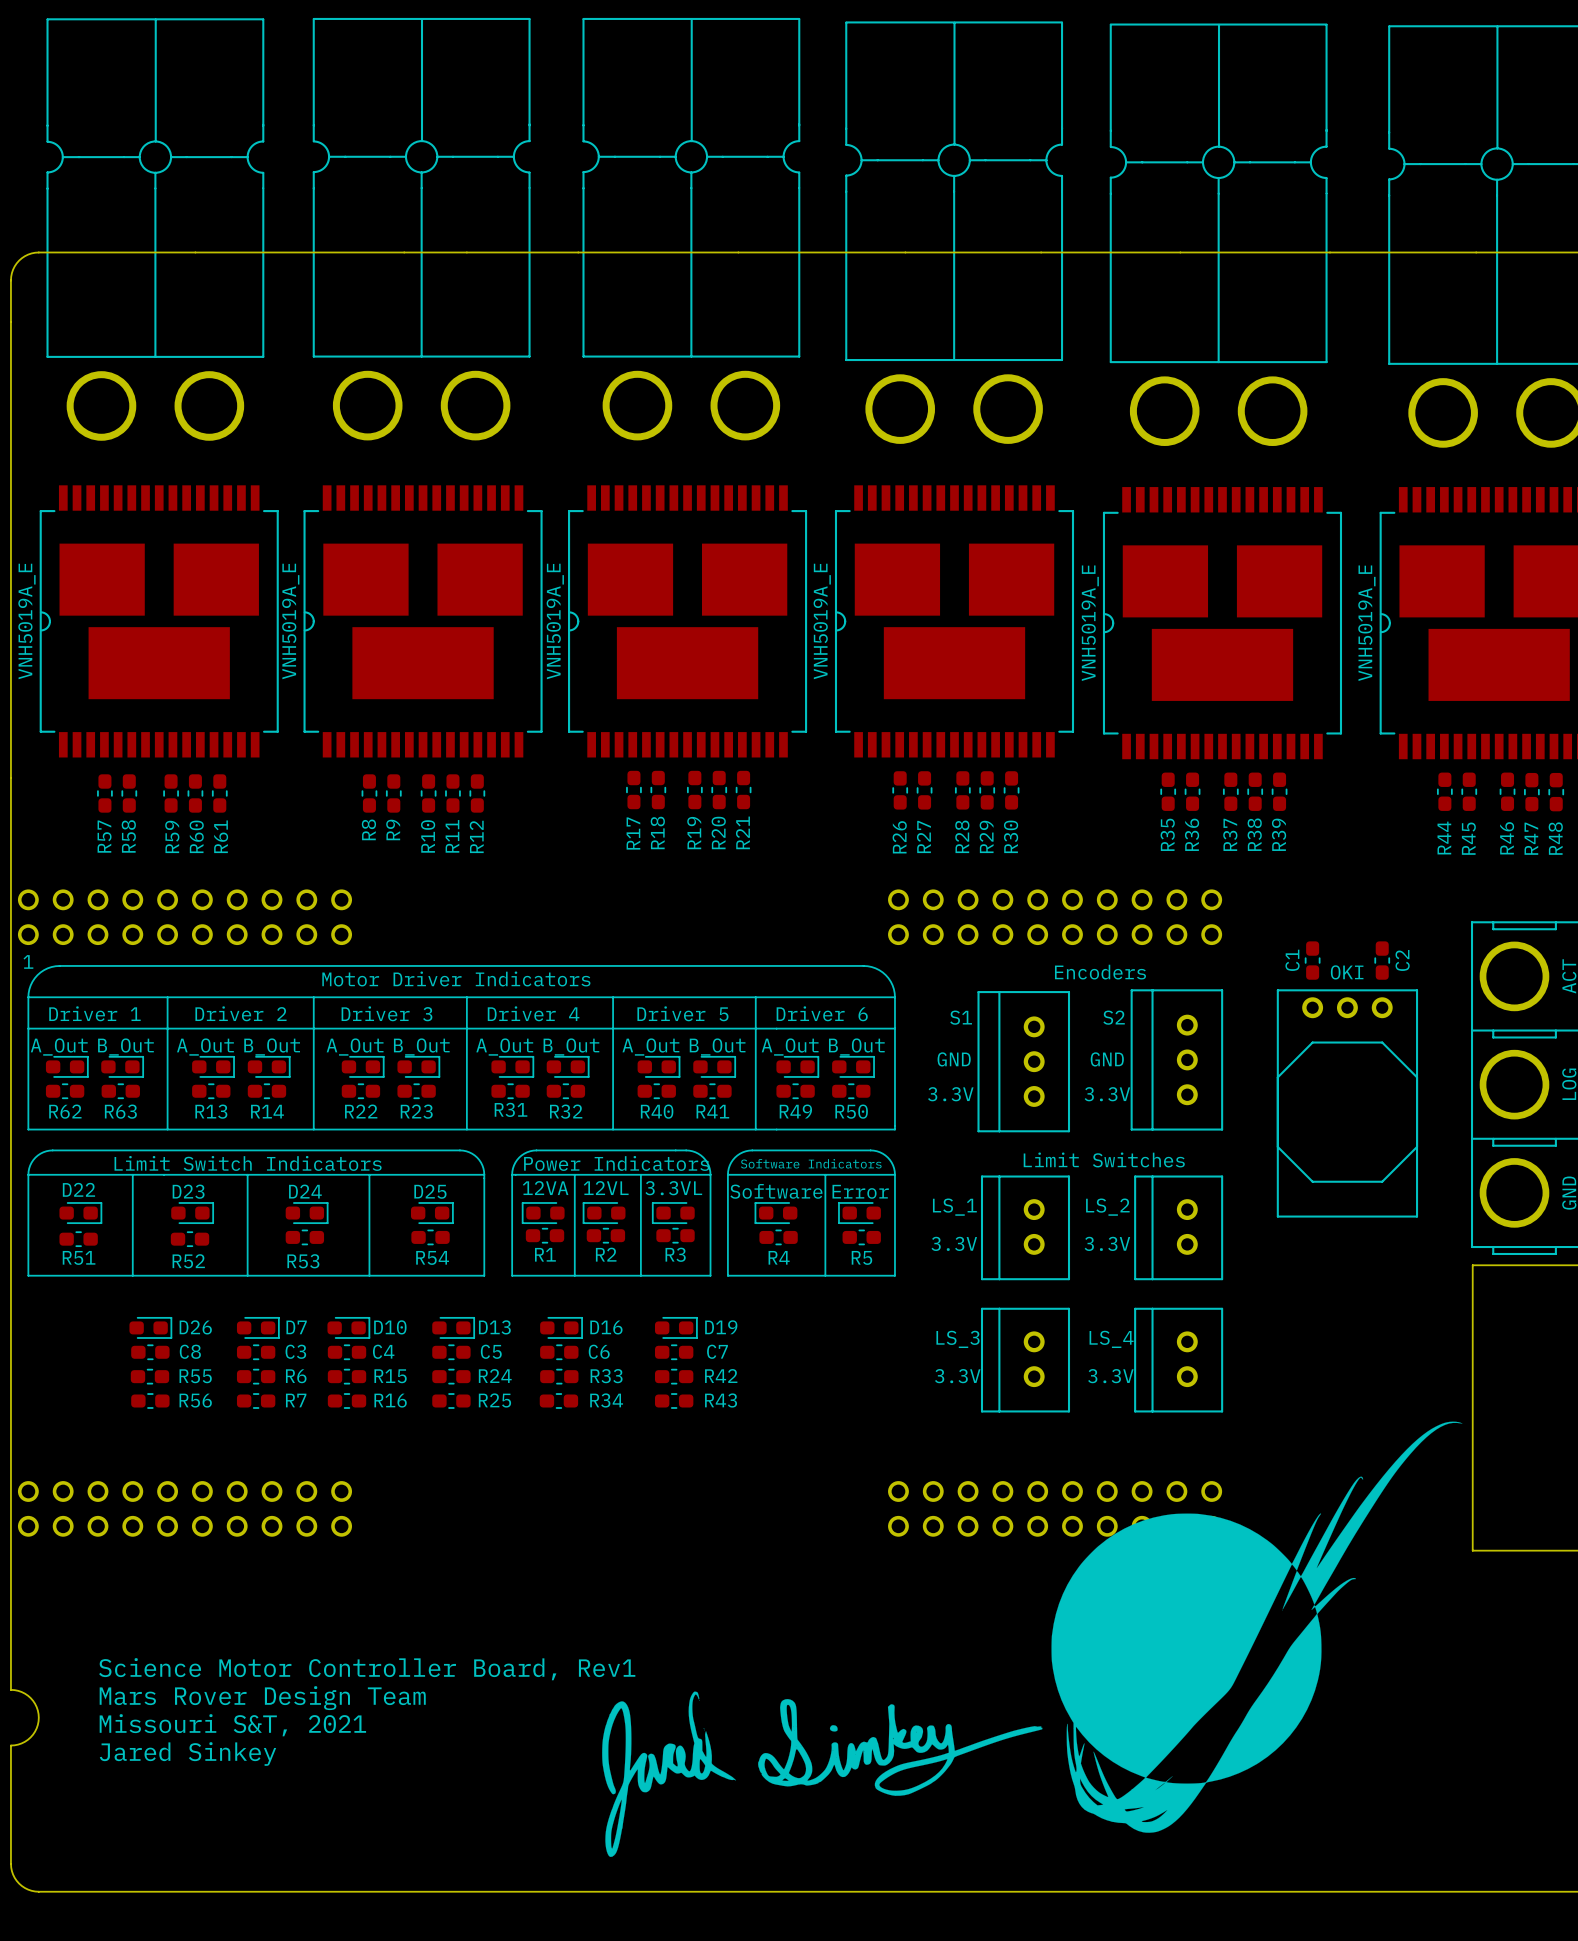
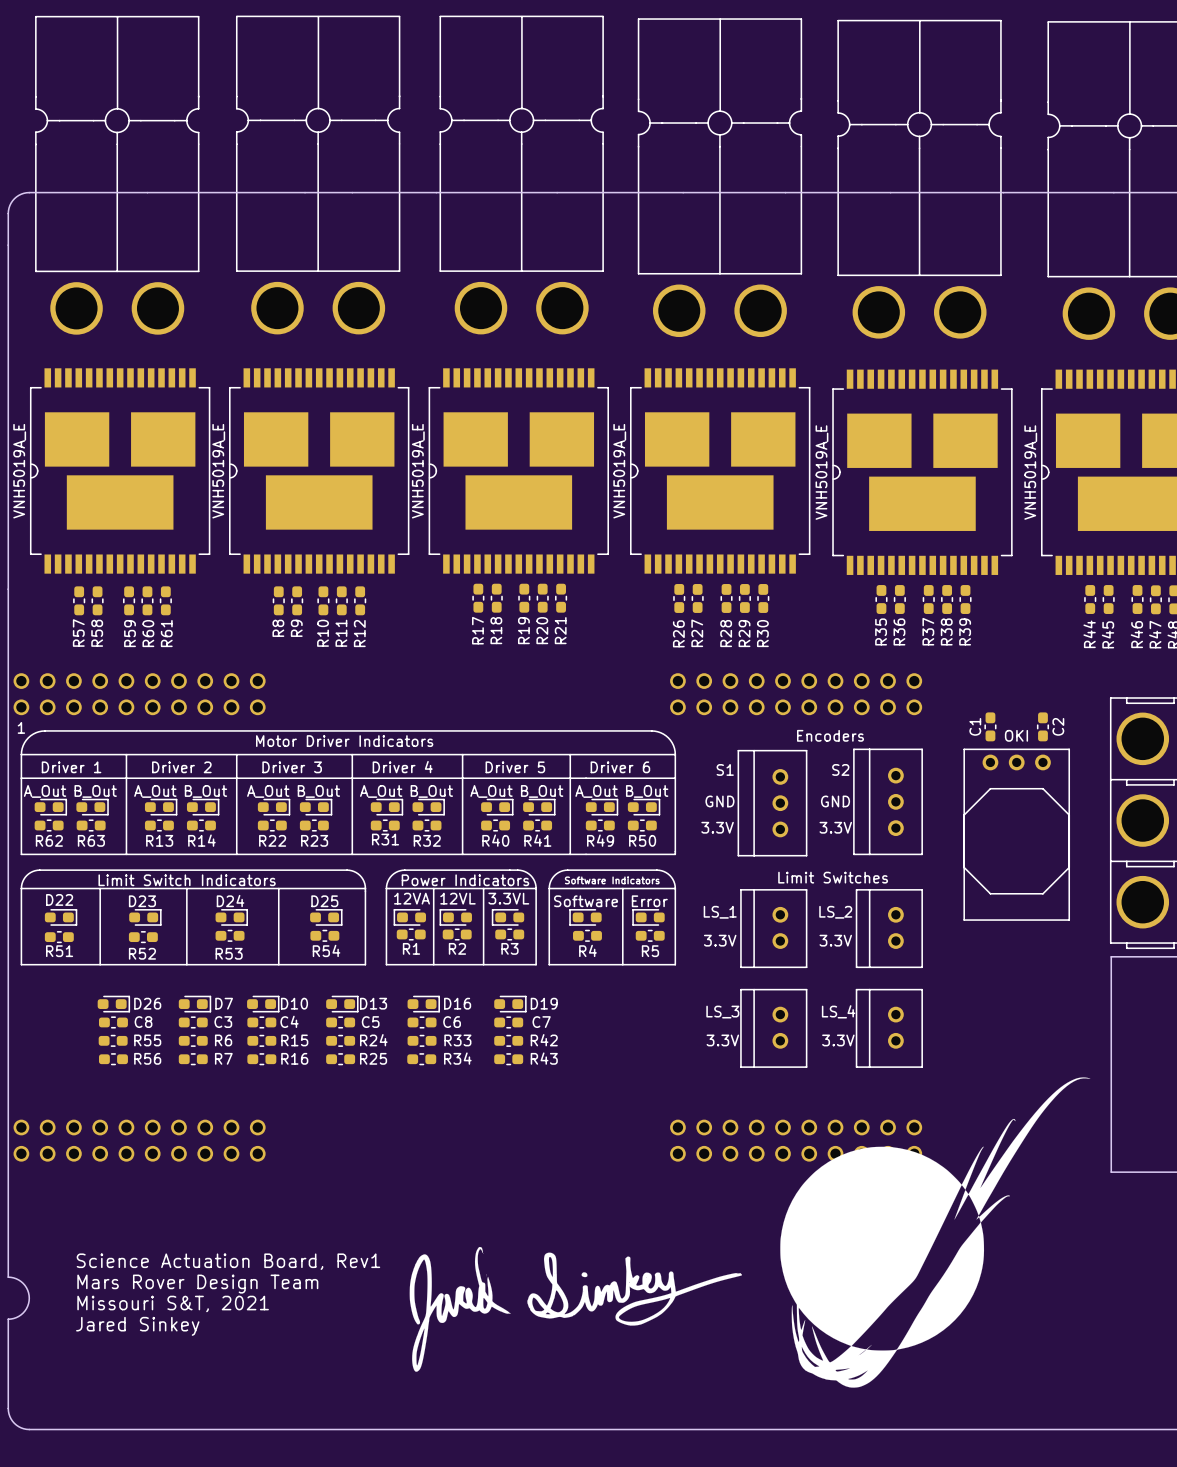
drawing position: (1256, 1627) -> (935, 1232)
text: Science Motor Controller Board, Rev1 (367, 1669) -> Science Actuation Board, Rev1 (228, 1261)
drawing position: (822, 1774) -> (575, 1309)

